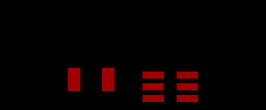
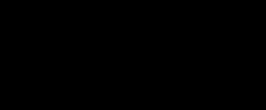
part: (91, 79) -> none
part: (170, 86) -> none

